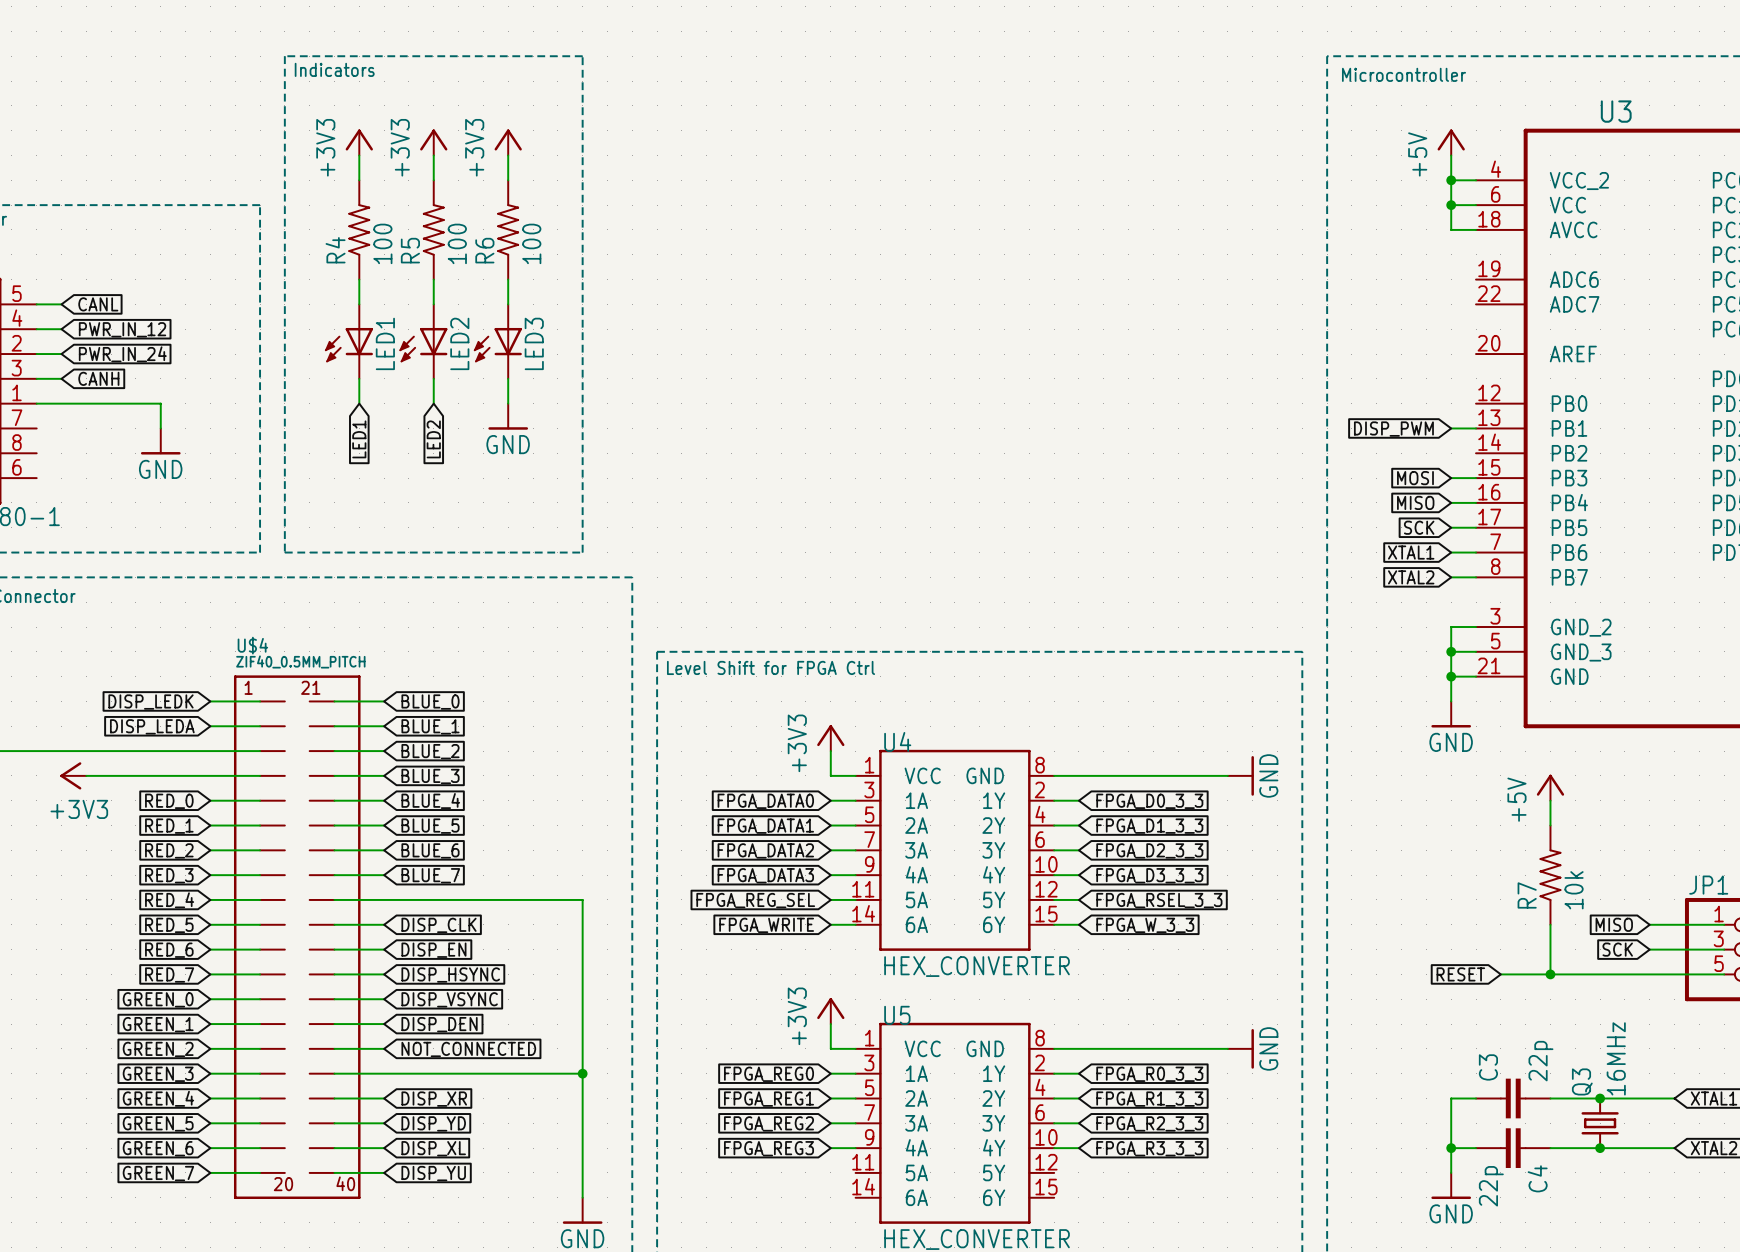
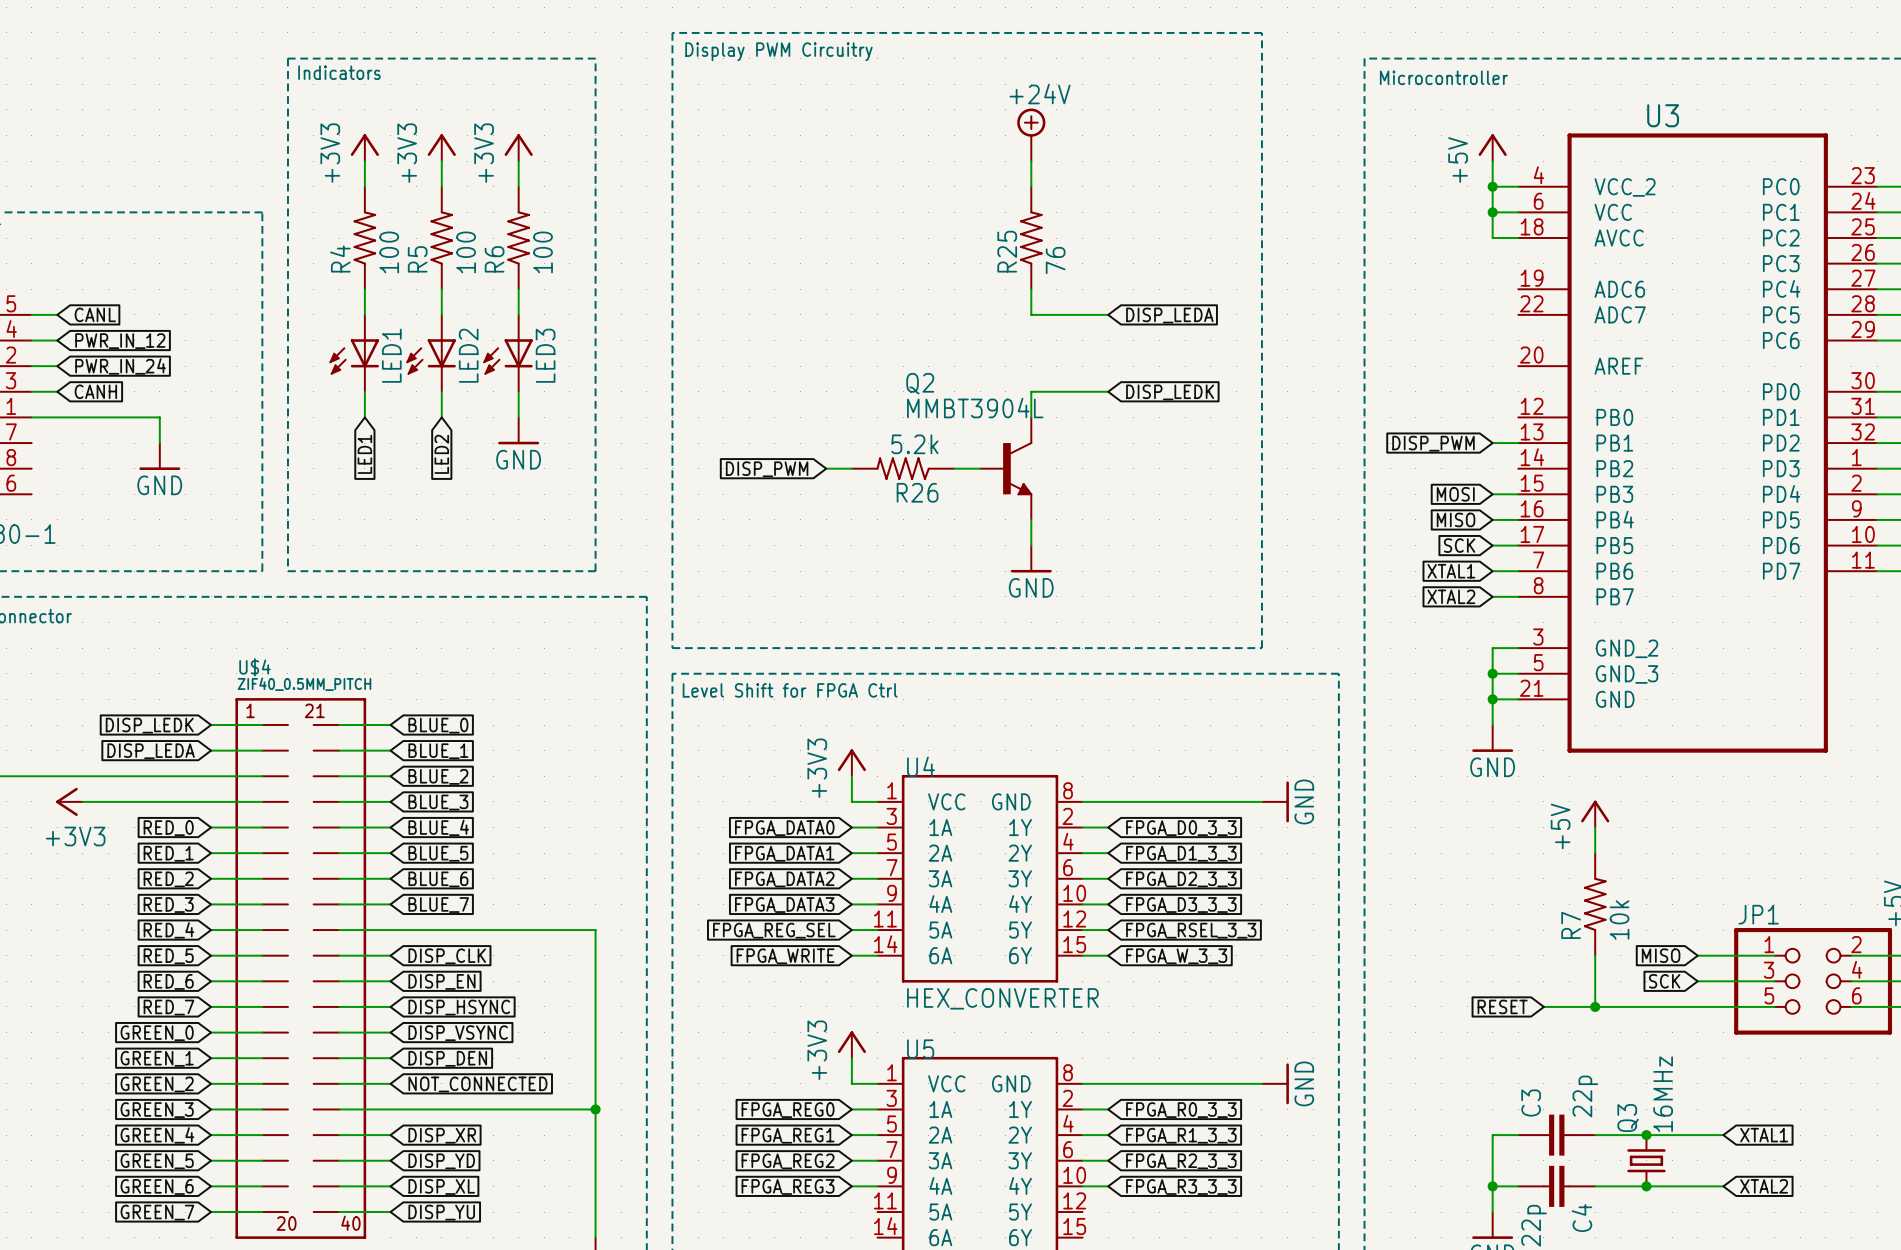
line: none -> (672, 32) (672, 648) (1261, 648) (1261, 32) (672, 32)
text: none -> Display PWM Circuitry (778, 51)
power symbol: none -> +24V (1031, 134)
wire: none -> (1031, 161) (1031, 186)
R25: none -> 76 (1031, 238)
wire: none -> (1031, 289) (1031, 314) (1108, 314)
global label: none -> DISP_LEDA (1169, 315)
wire: none -> (1108, 391) (1031, 391) (1031, 417)
global label: none -> DISP_LEDK (1170, 392)
global label: none -> DISP_PWM (767, 469)
wire: none -> (826, 468) (851, 468)
R26: none -> 5.2k (903, 468)
wire: none -> (954, 468) (980, 468)
Q2: none -> MMBT3904L (1006, 468)
wire: none -> (1031, 519) (1031, 545)
power symbol: none -> GND (1031, 559)

